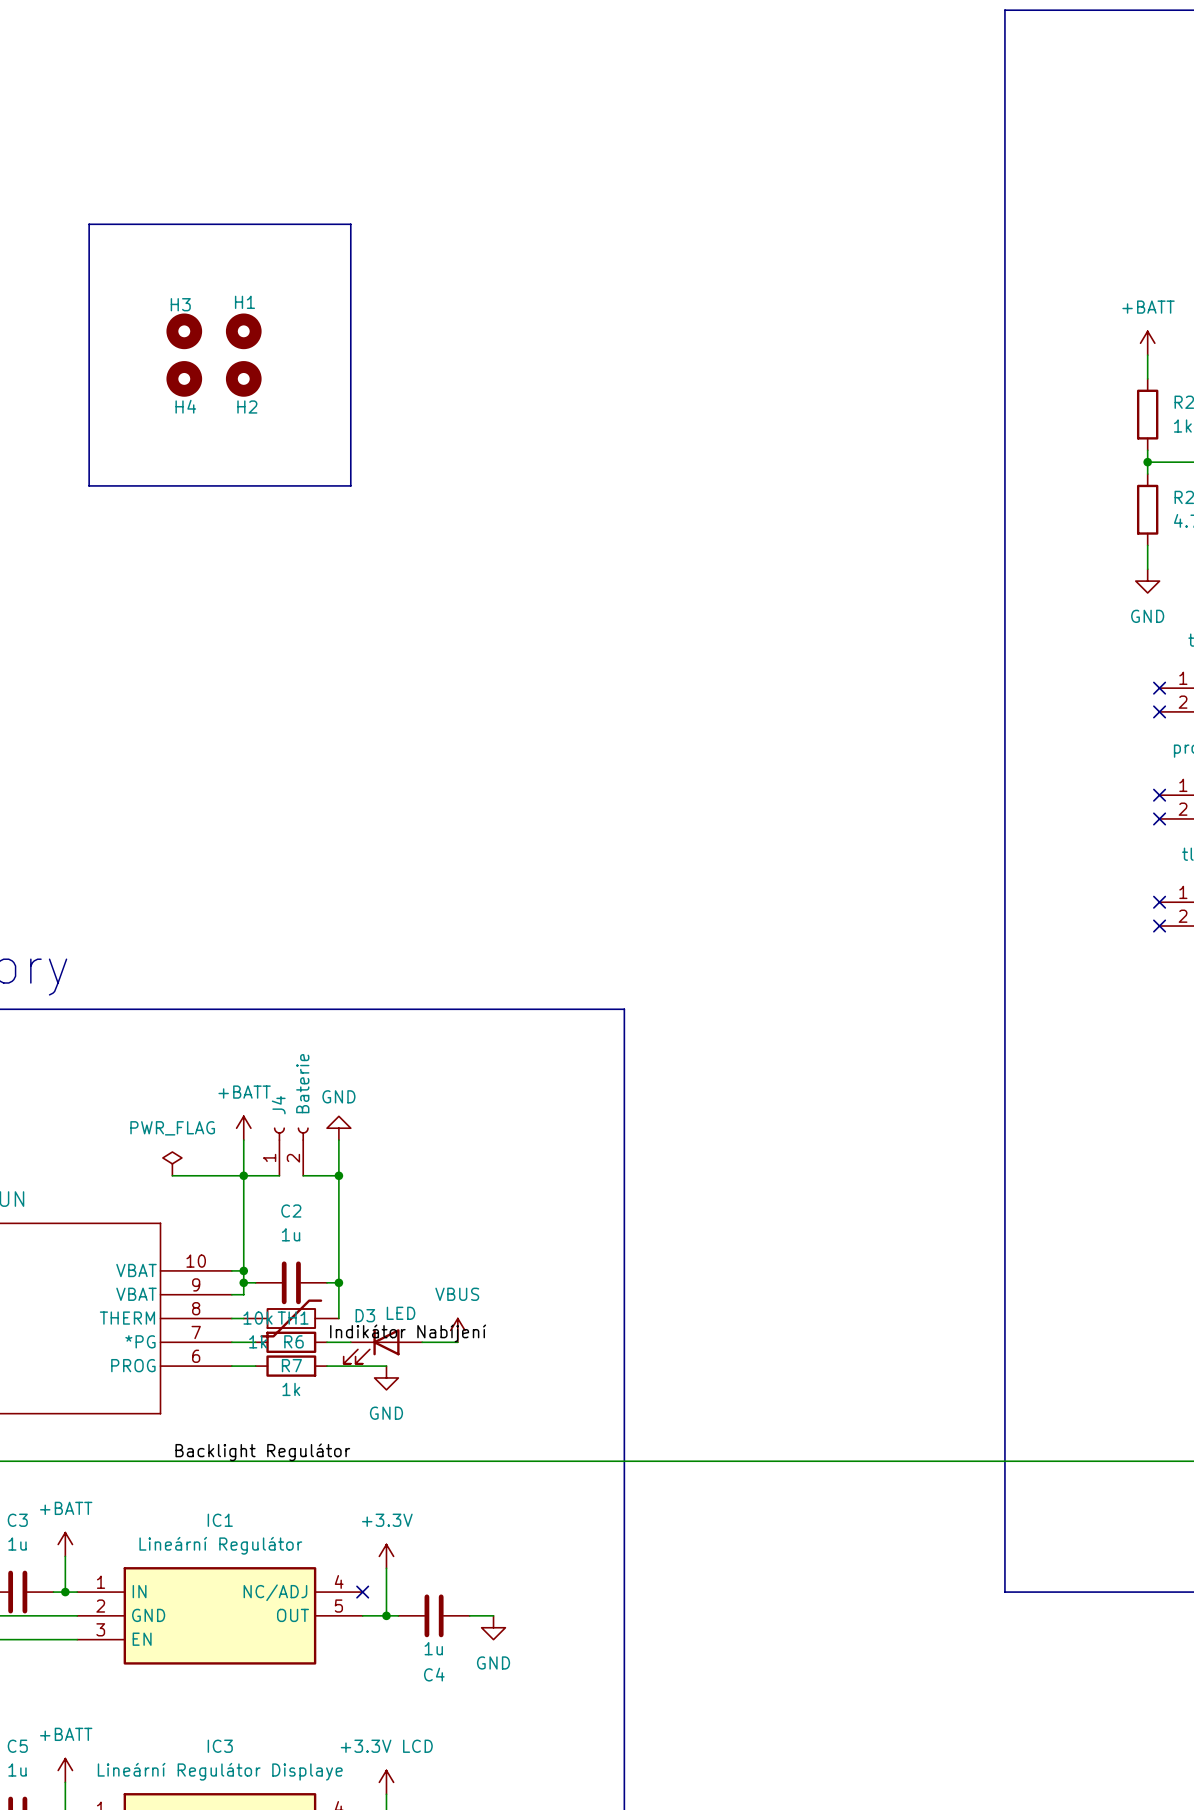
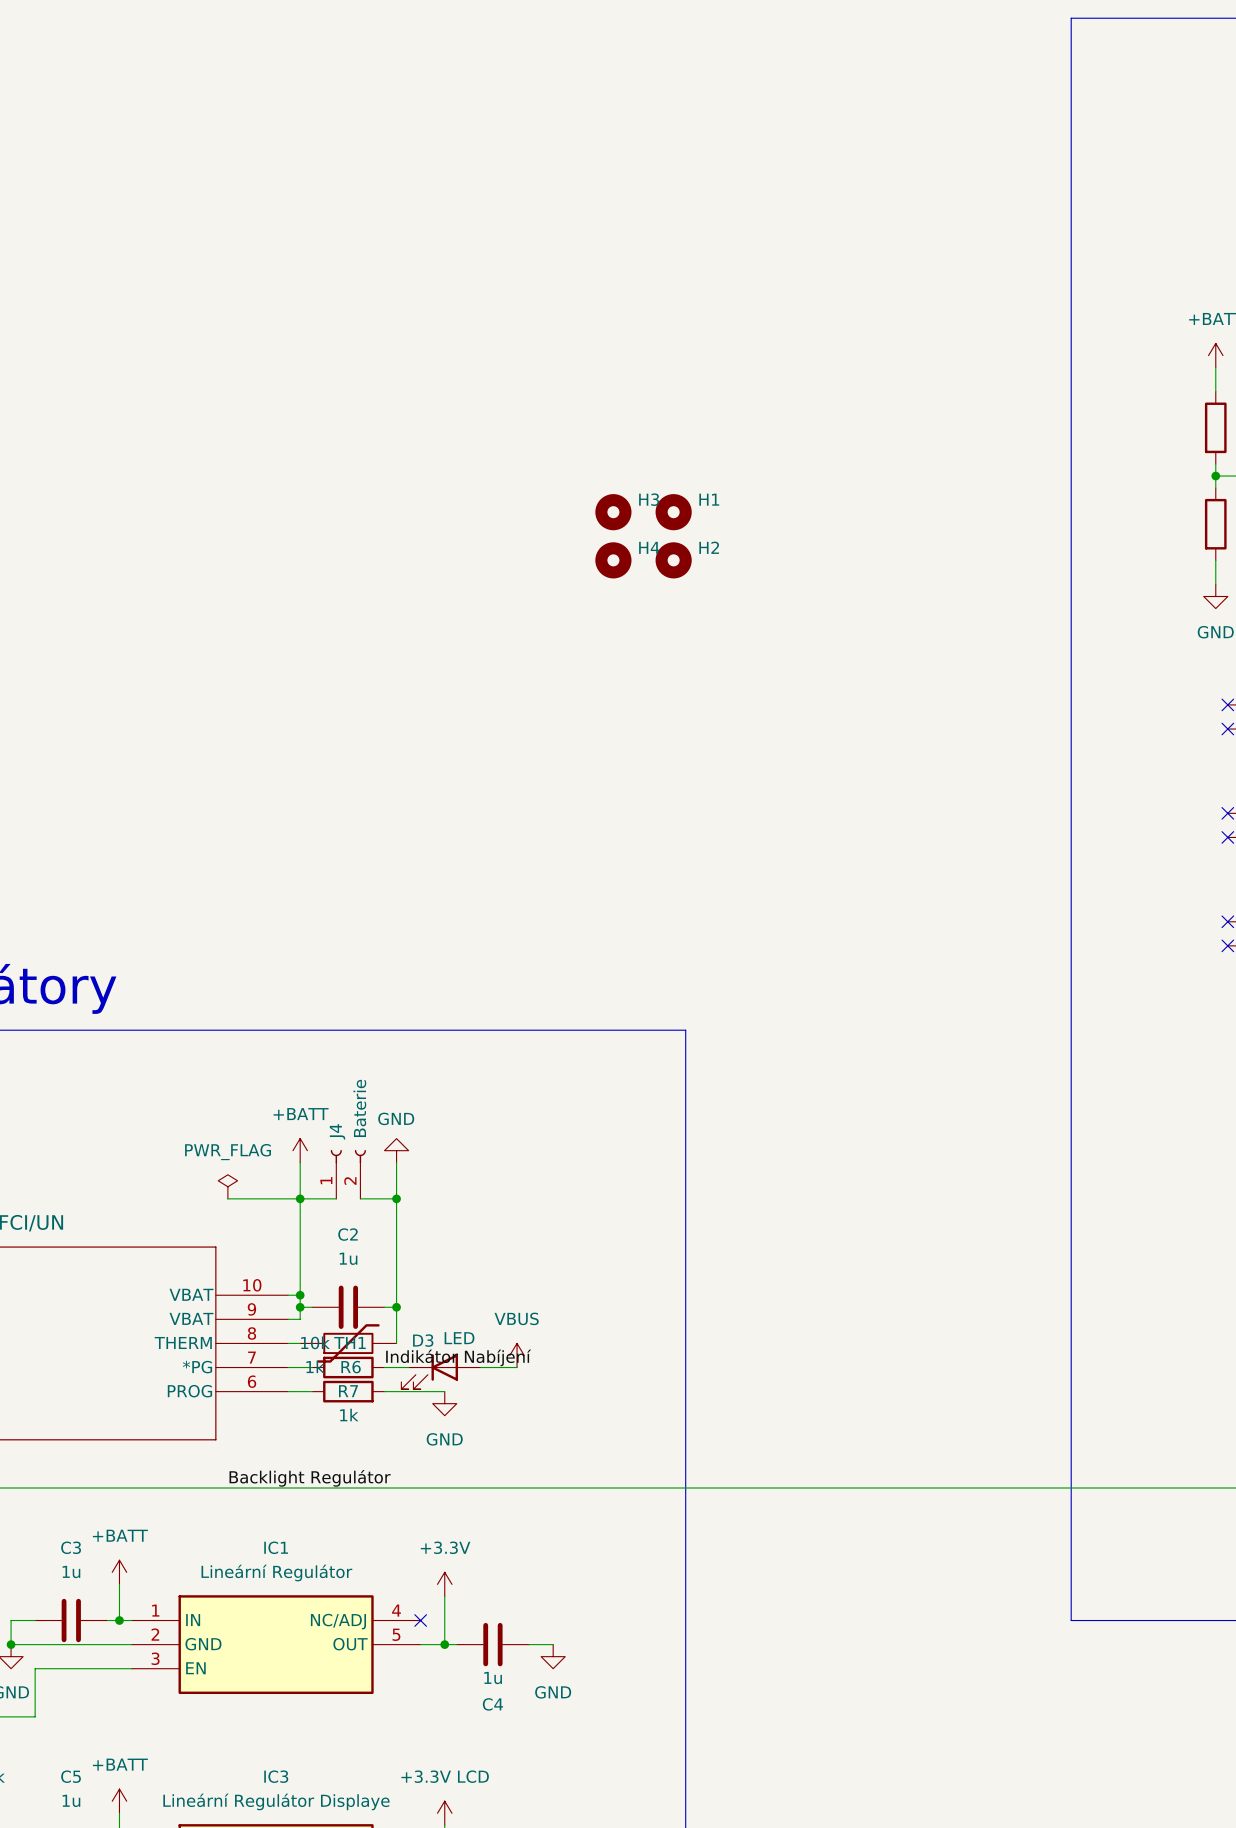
line: (89, 224) (350, 224) (350, 485) (89, 485) (89, 224) -> none
H1 name position: H1 (244, 302) -> H1 (709, 499)
H3 name position: H3 (180, 304) -> H3 (649, 499)
H3 position: (184, 331) -> (613, 512)
H1 position: (243, 331) -> (673, 512)
H4 position: (184, 378) -> (613, 560)
H2 position: (243, 378) -> (673, 560)
H4 name position: H4 (185, 406) -> H4 (649, 547)
H2 name position: H2 (247, 407) -> H2 (709, 547)

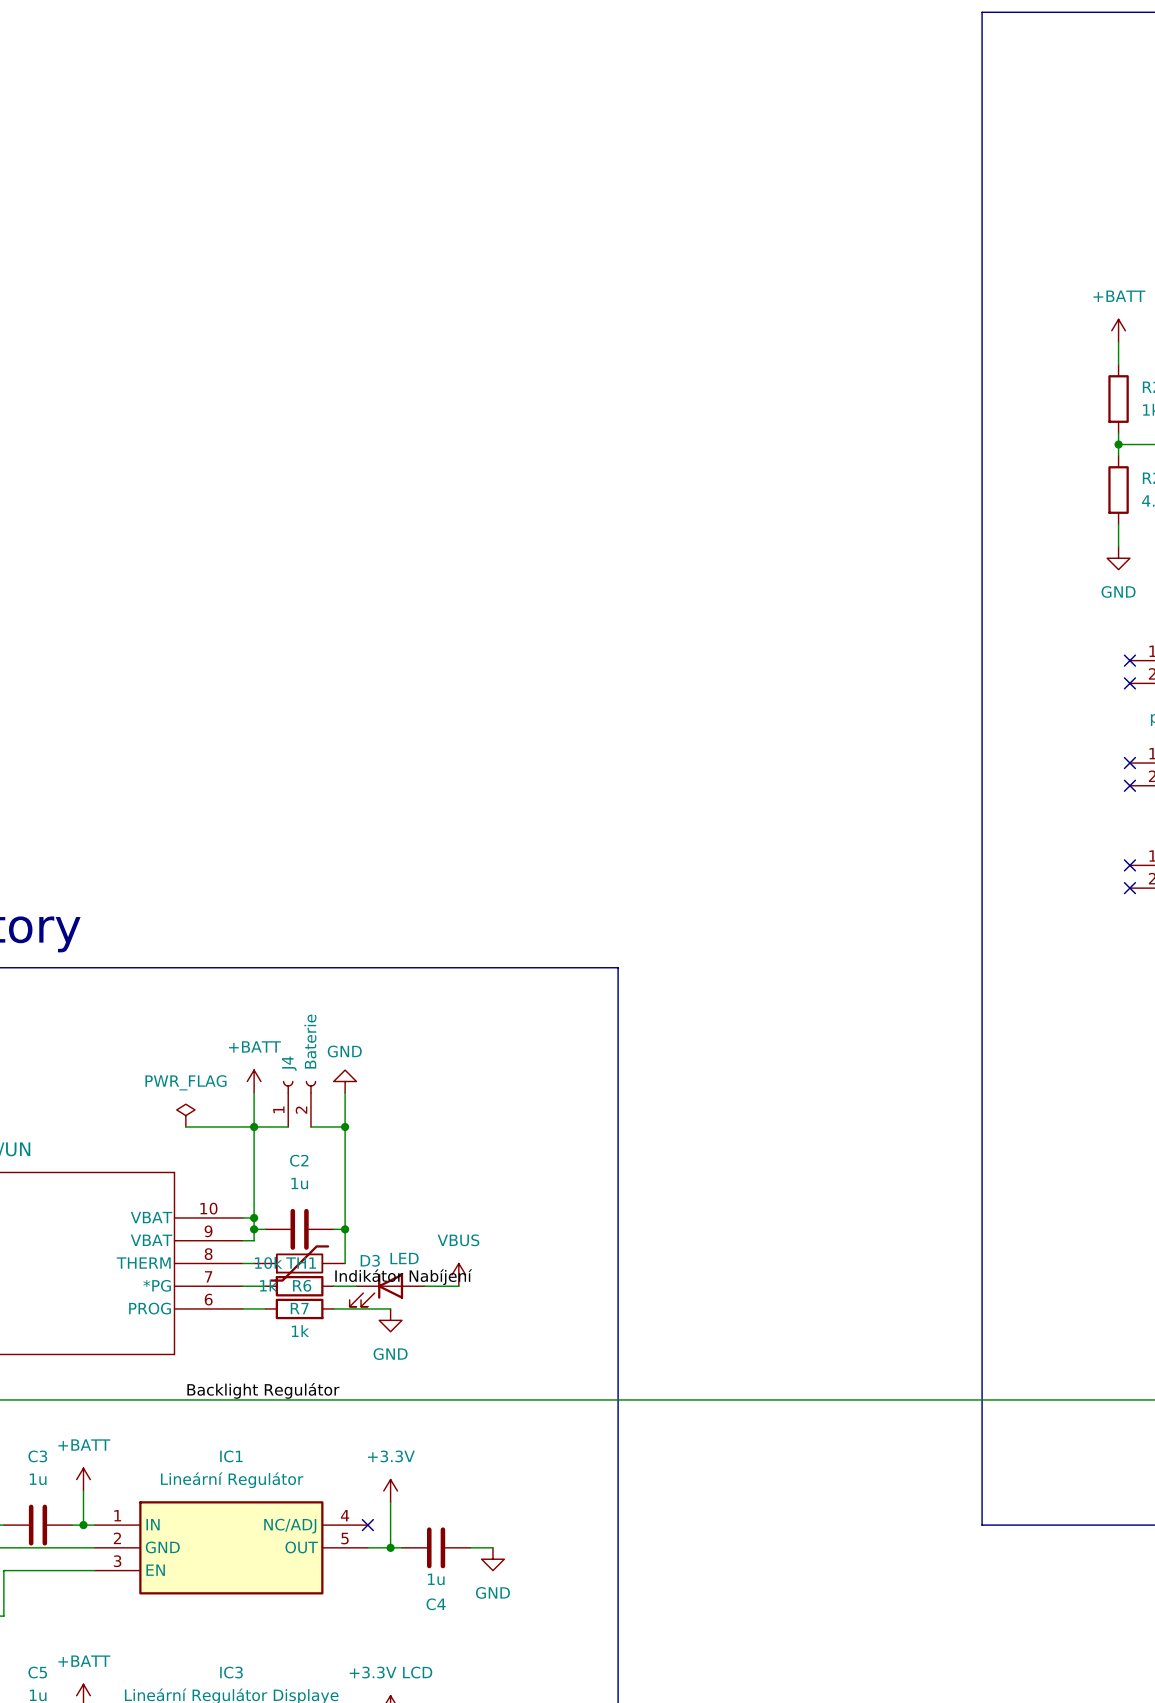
H3: (613, 512) -> none
H1: (673, 512) -> none
H4: (613, 560) -> none
H2: (673, 560) -> none

